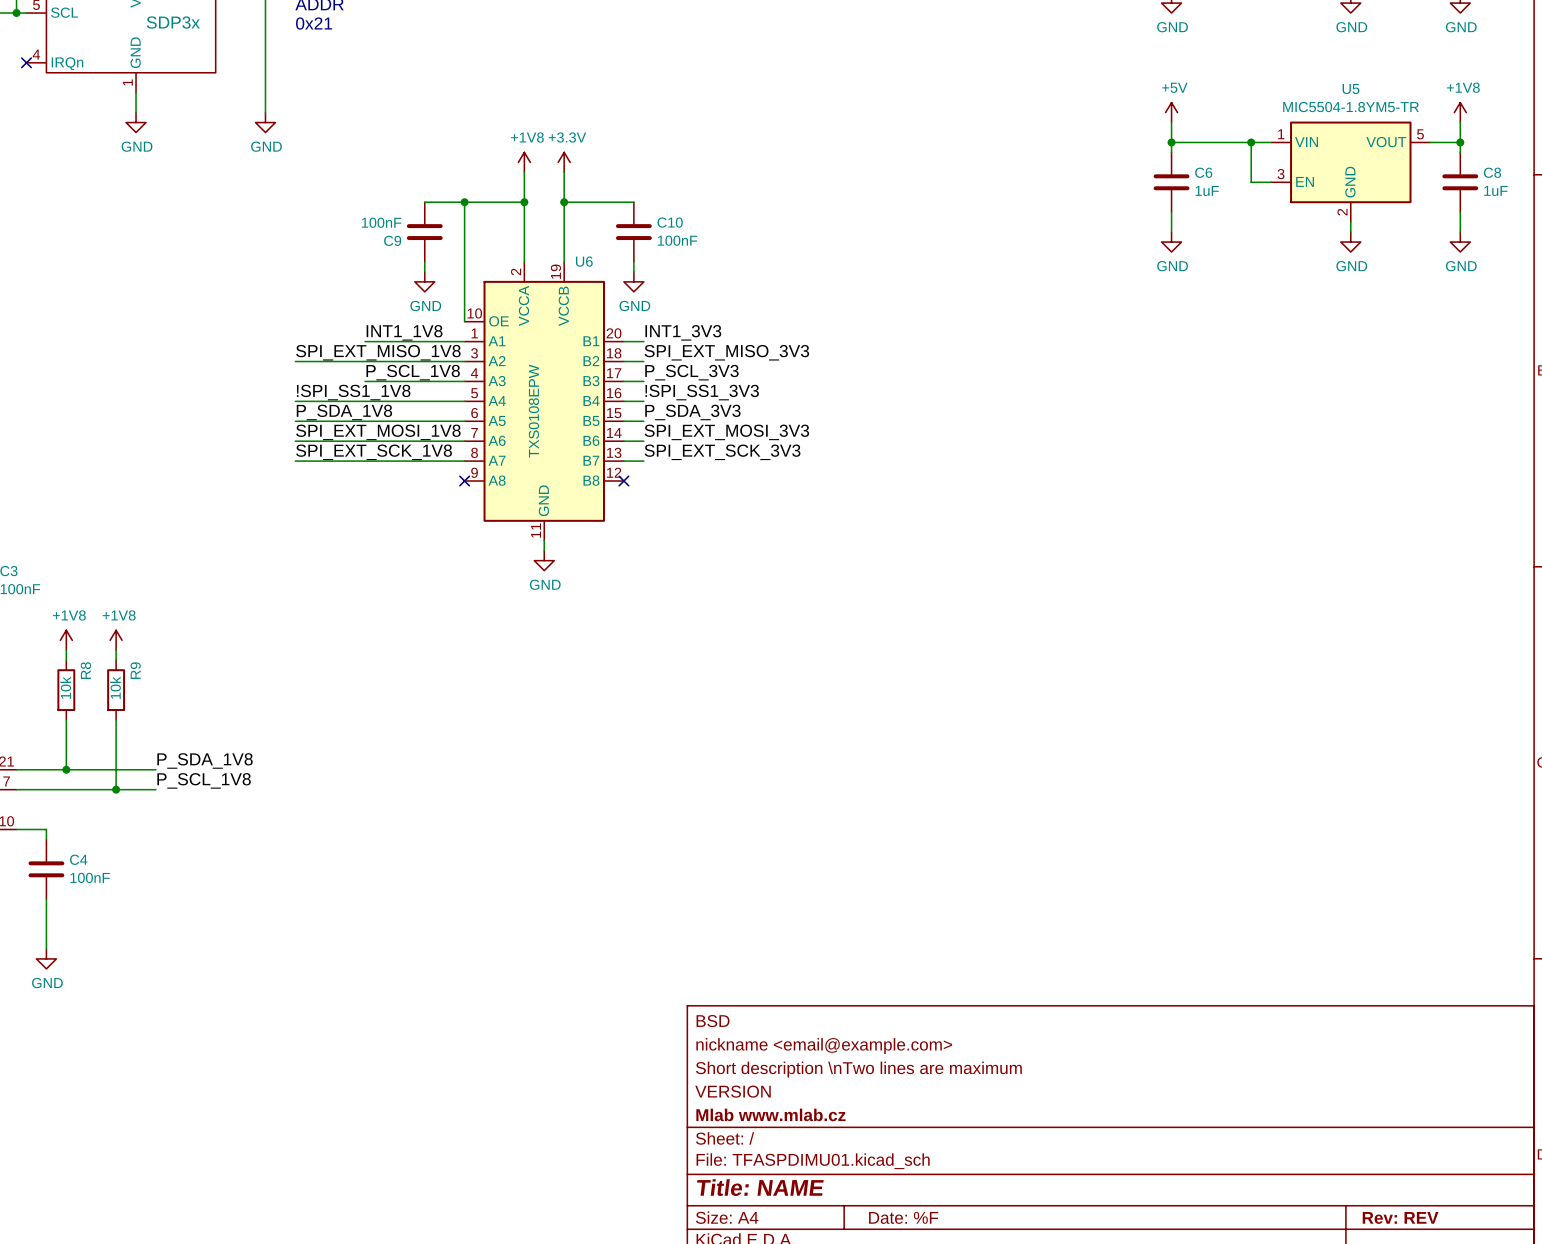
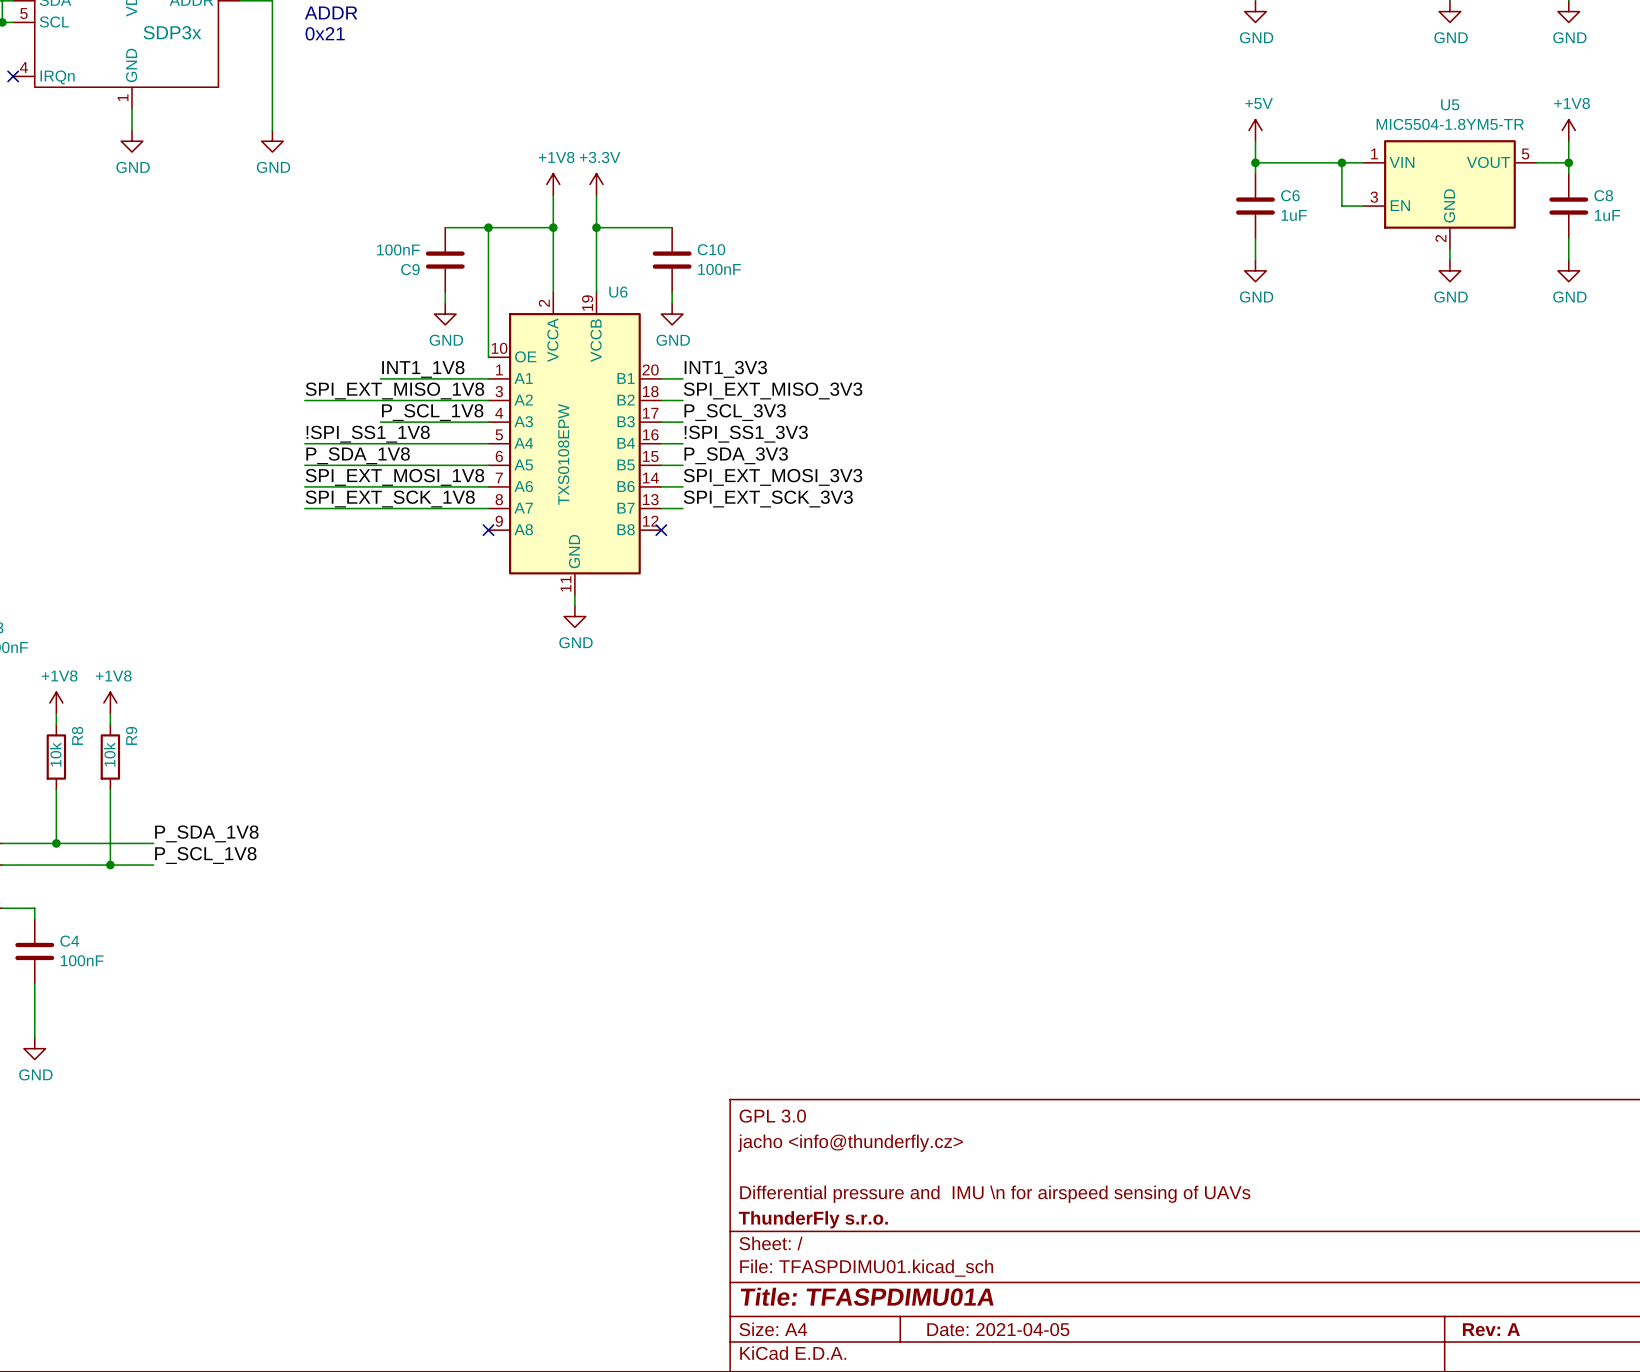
title block: BSD (713, 1021) -> GPL 3.0 (772, 1116)
title block: nickname <email@example.com> (824, 1046) -> jacho <info@thunderfly.cz> (850, 1143)
title block: Short description \nTwo lines are maximum (858, 1069) -> none
title block: VERSION (732, 1091) -> Differential pressure and IMU \n for airspeed sensing of UAVs (995, 1194)
title block: Mlab www.mlab.cz (770, 1114) -> ThunderFly s.r.o. (813, 1219)
title block: Title: NAME (760, 1187) -> Title: TFASPDIMU01A (867, 1296)
title block: Date: %F (903, 1217) -> Date: 2021-04-05 (998, 1329)
title block: Rev: REV (1400, 1217) -> Rev: A (1491, 1329)

